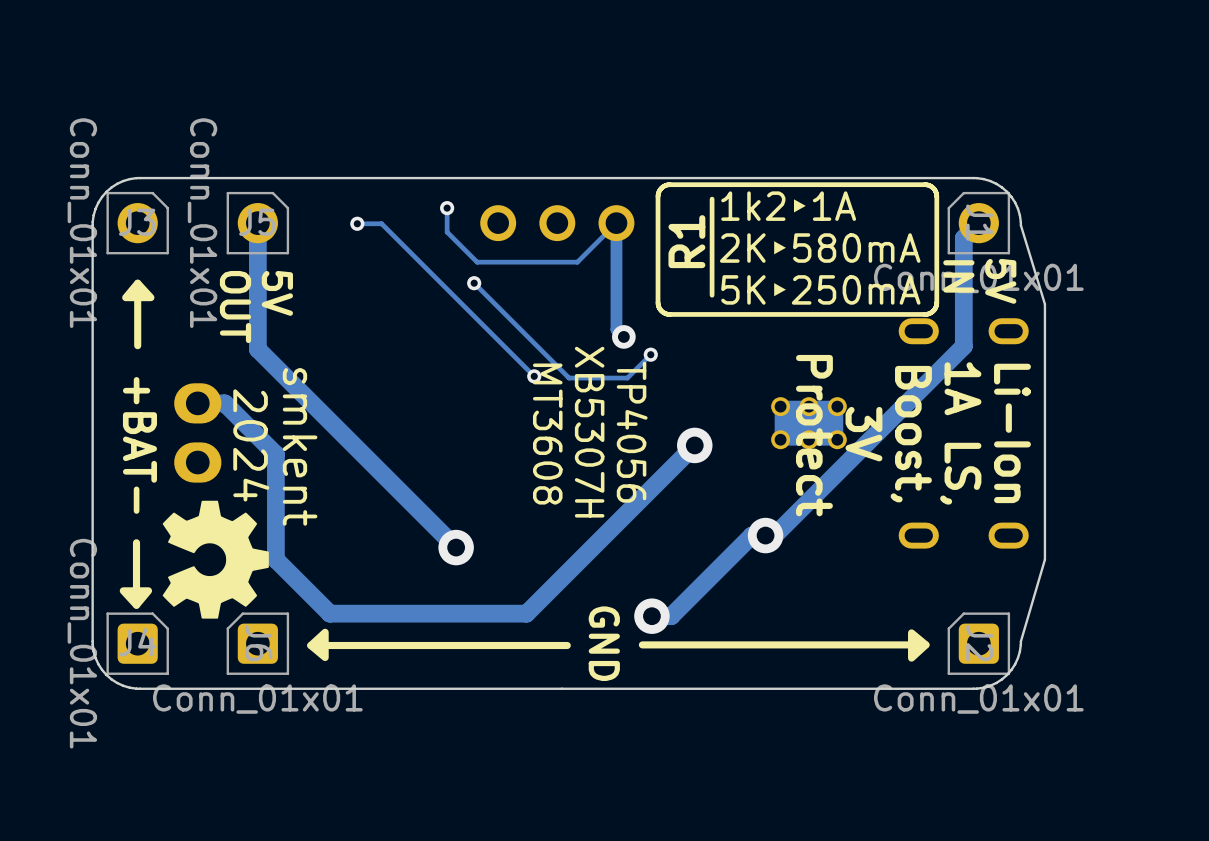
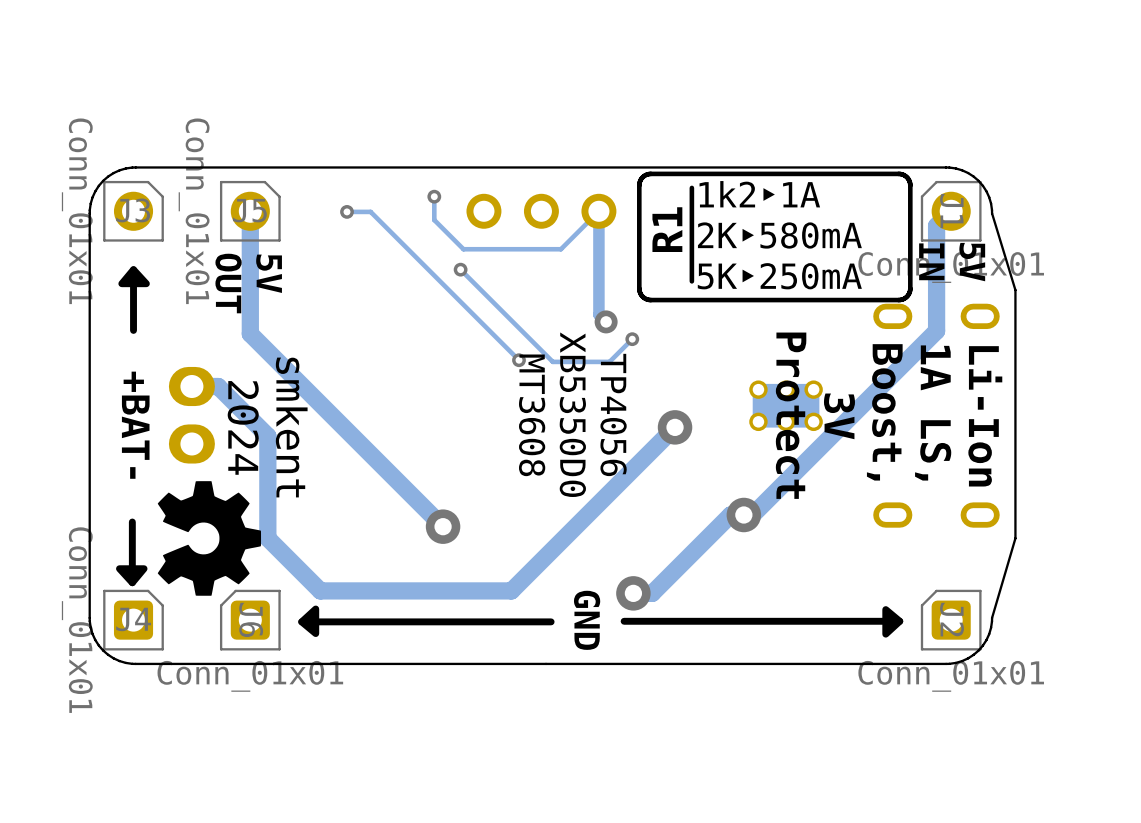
text: XB5307H (589, 432) -> XB5350D0 (572, 414)

